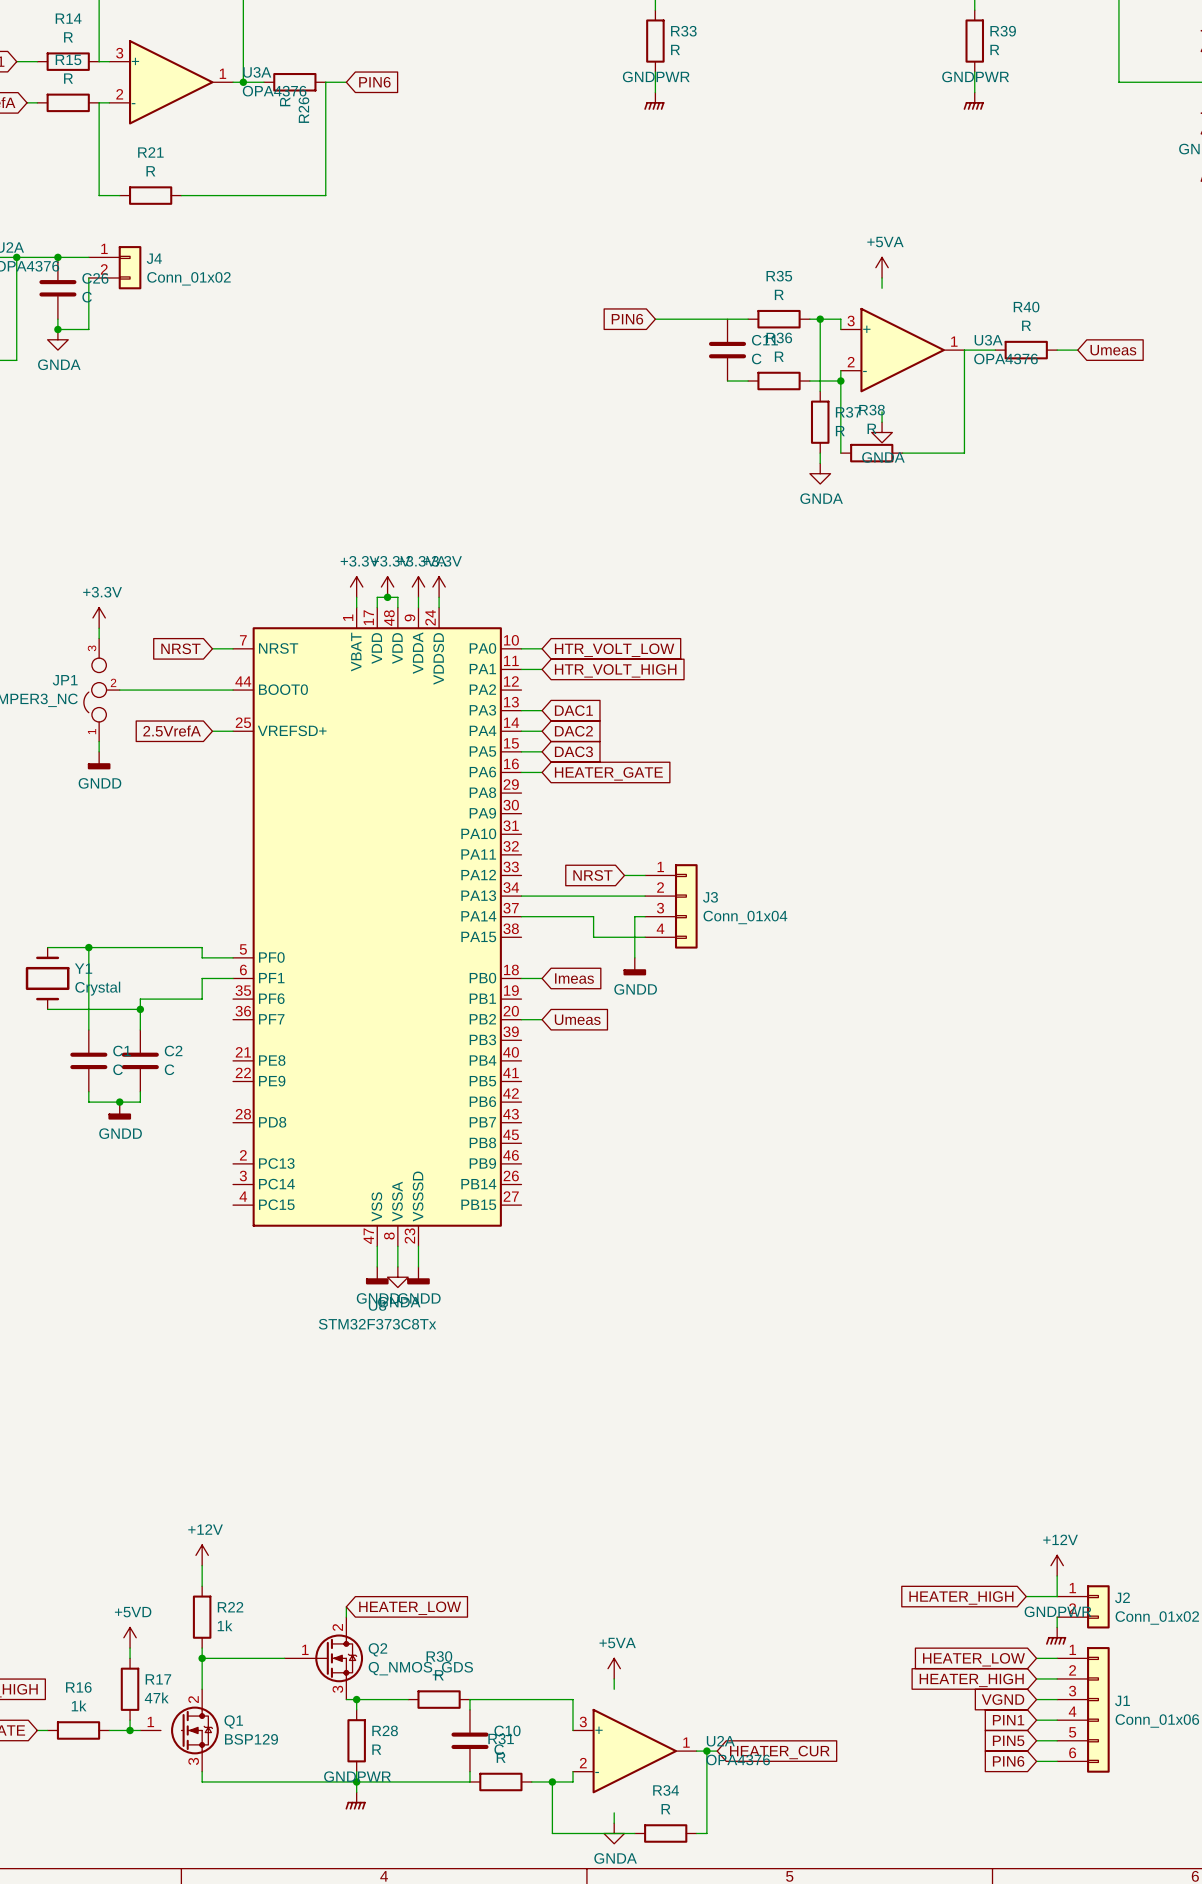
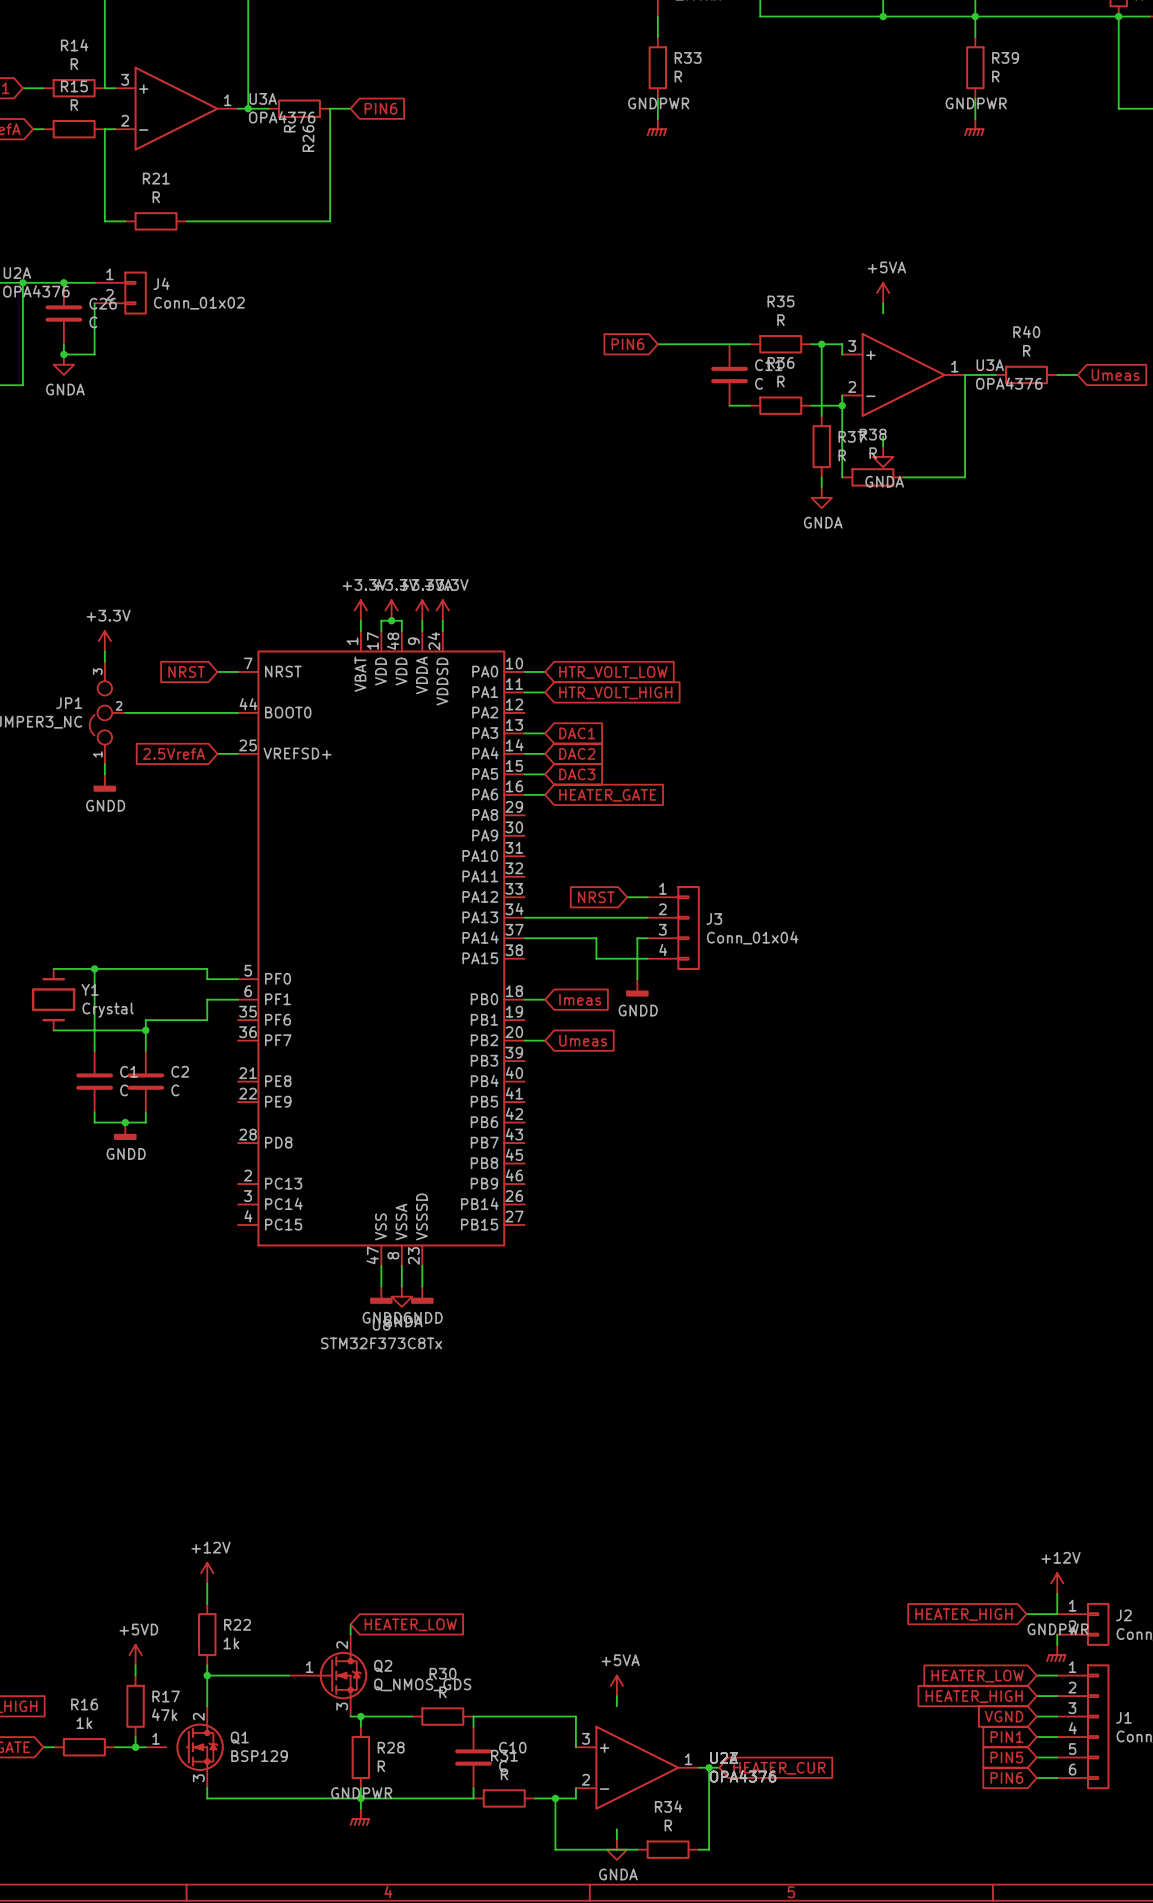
part: none -> OPA4376 (743, 1767)

